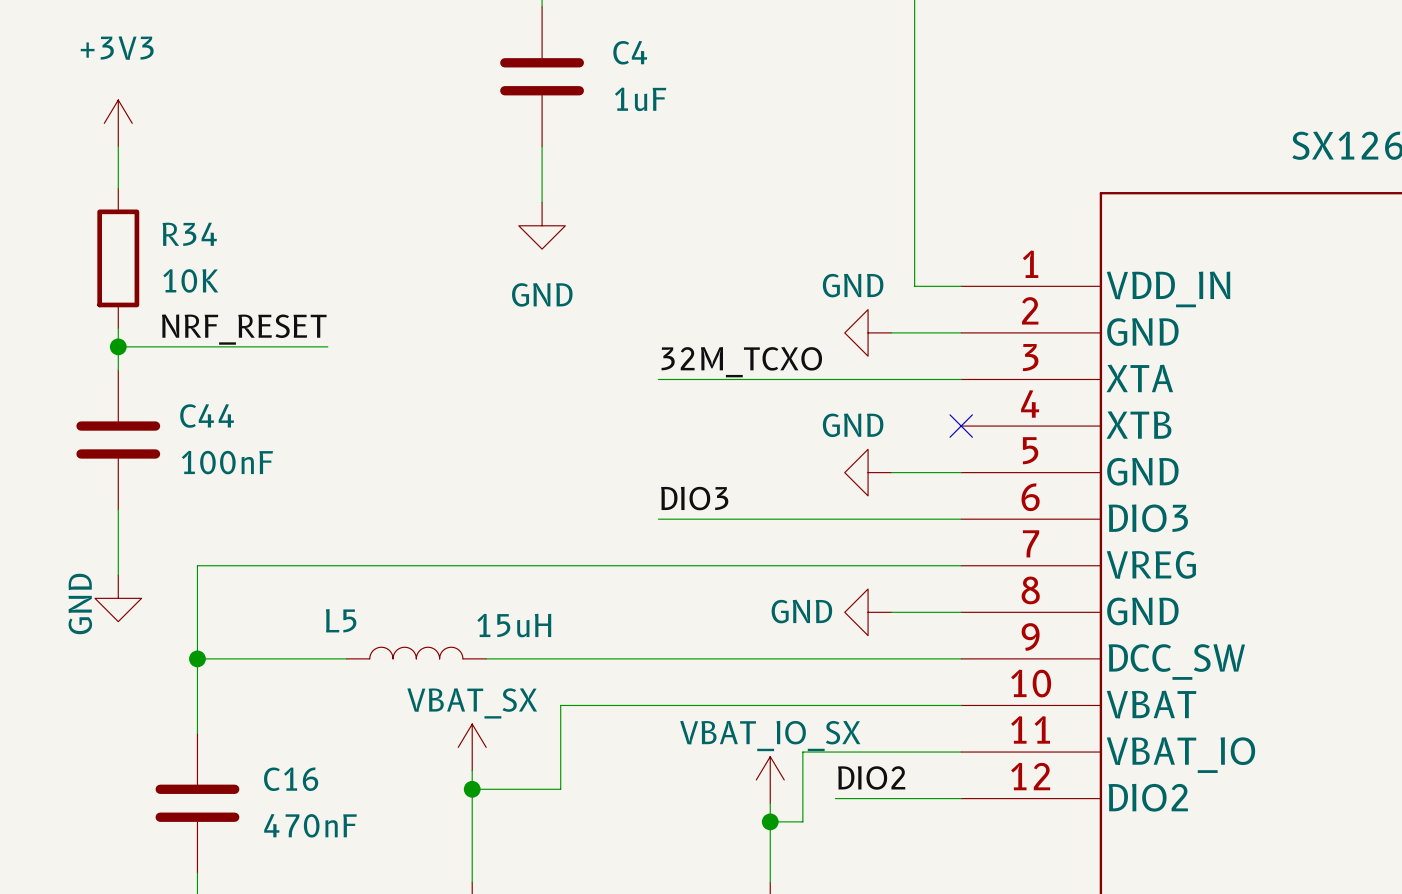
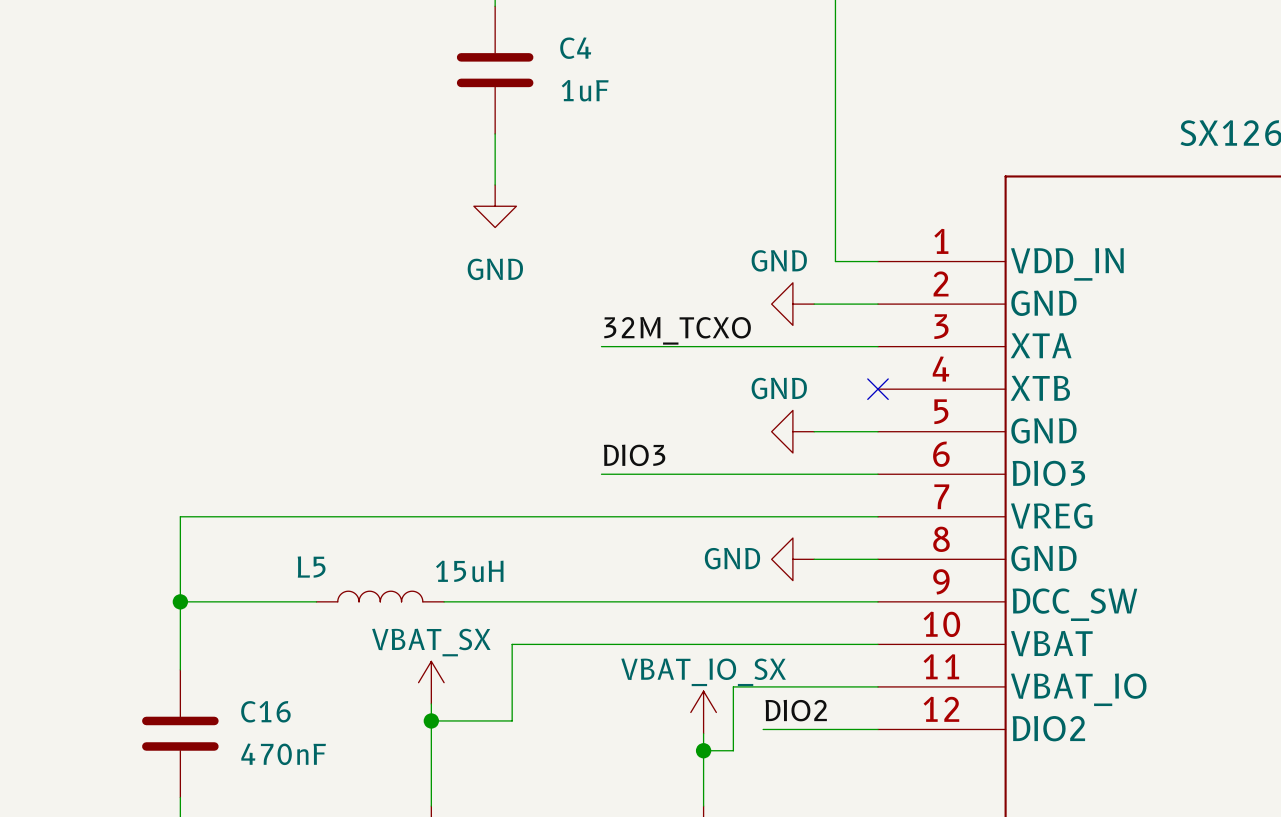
power symbol: +3V3 (118, 123) -> none
wire: (118, 146) (118, 188) -> none
R34: 10K (118, 258) -> none
wire: (118, 328) (118, 370) -> none
label: NRF_RESET (244, 329) -> none
wire: (118, 346) (327, 346) -> none
junction: (118, 346) -> none
C44: 100nF (118, 440) -> none
wire: (118, 509) (118, 575) -> none
power symbol: GND (118, 598) -> none

